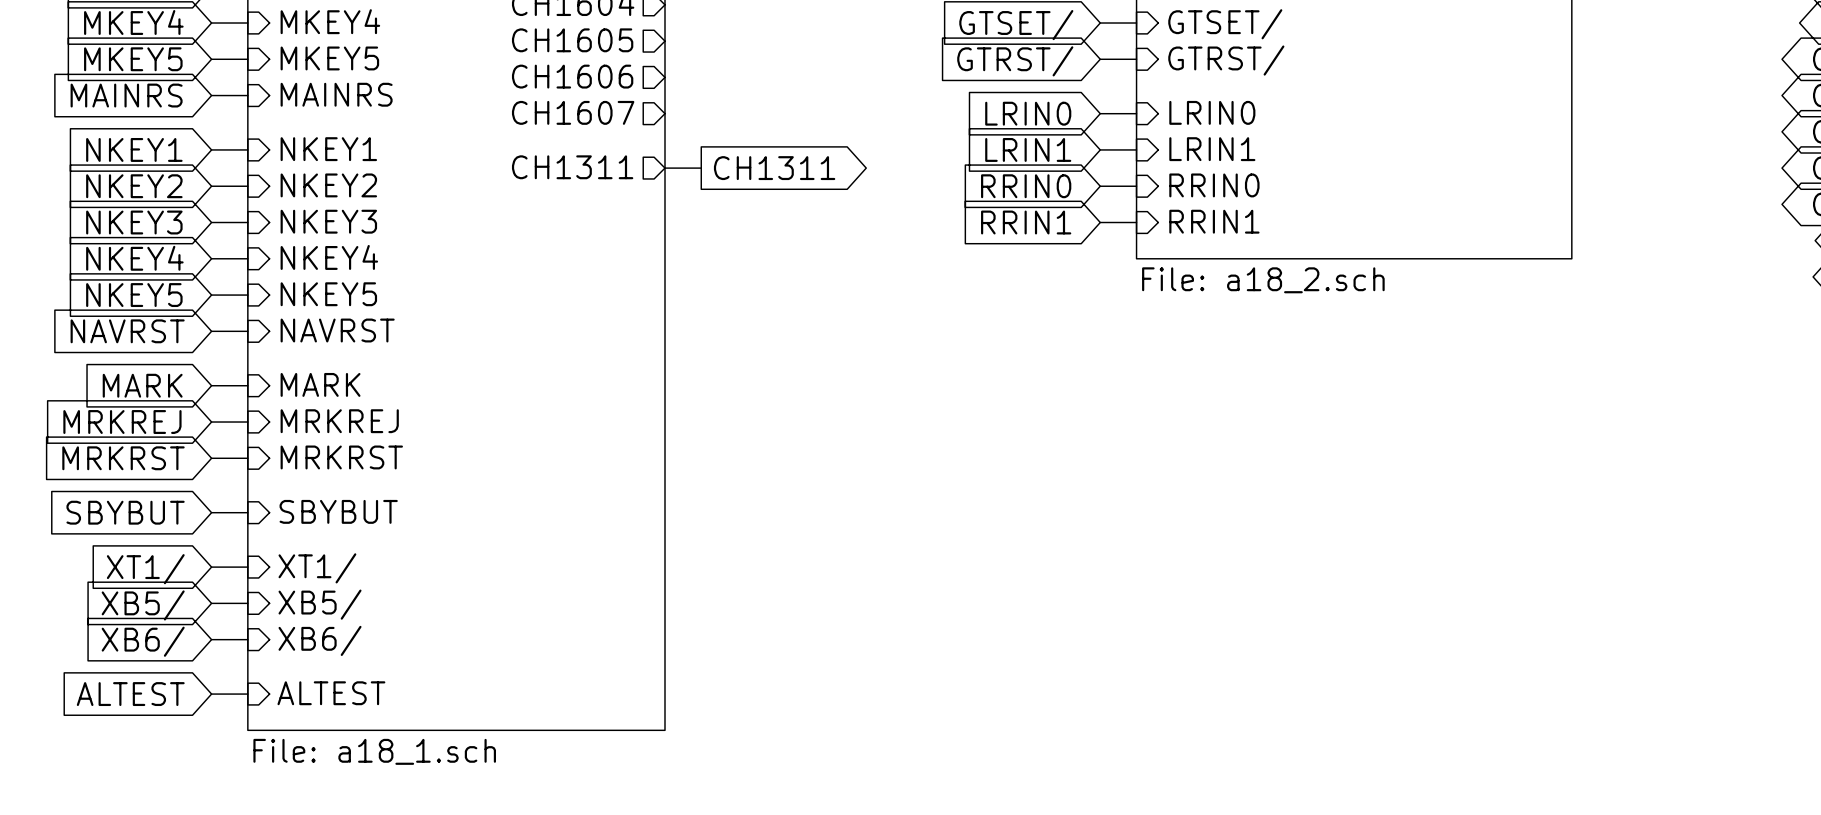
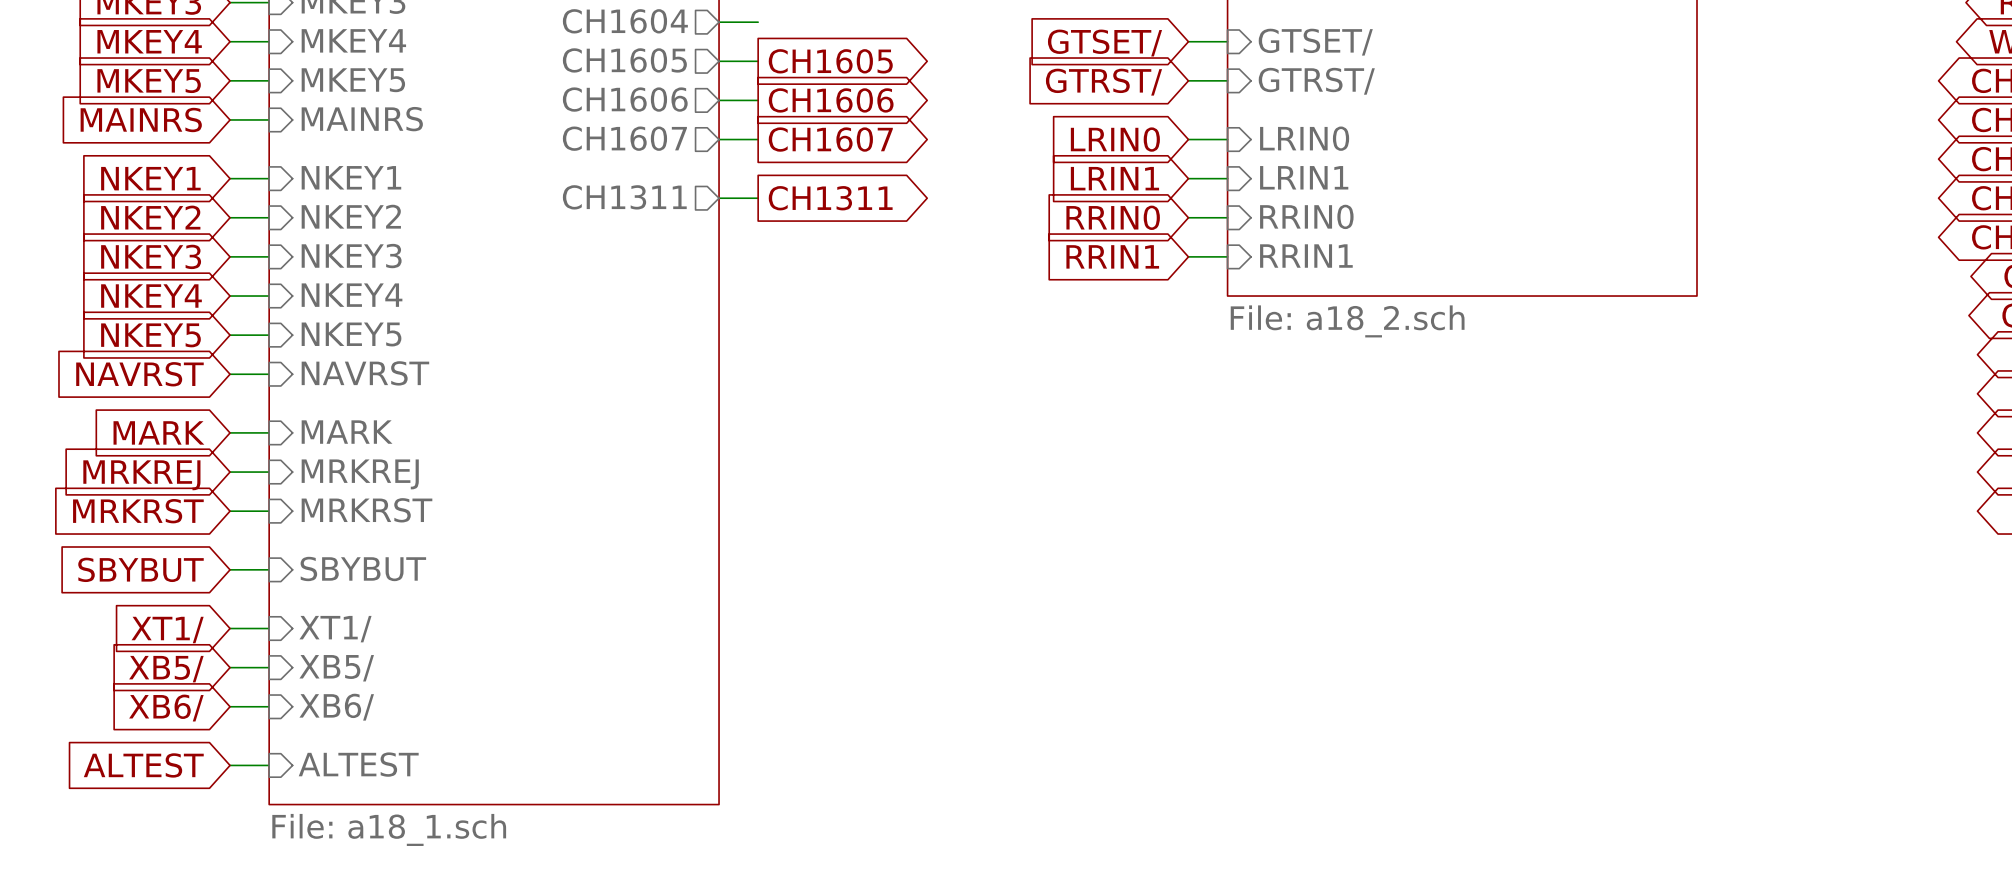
wire: none -> (719, 22) (758, 22)
wire: none -> (719, 61) (758, 61)
global label: none -> CH1605 (830, 61)
wire: none -> (719, 100) (758, 100)
global label: none -> CH1606 (831, 100)
wire: none -> (719, 139) (758, 139)
global label: none -> CH1607 (830, 139)

